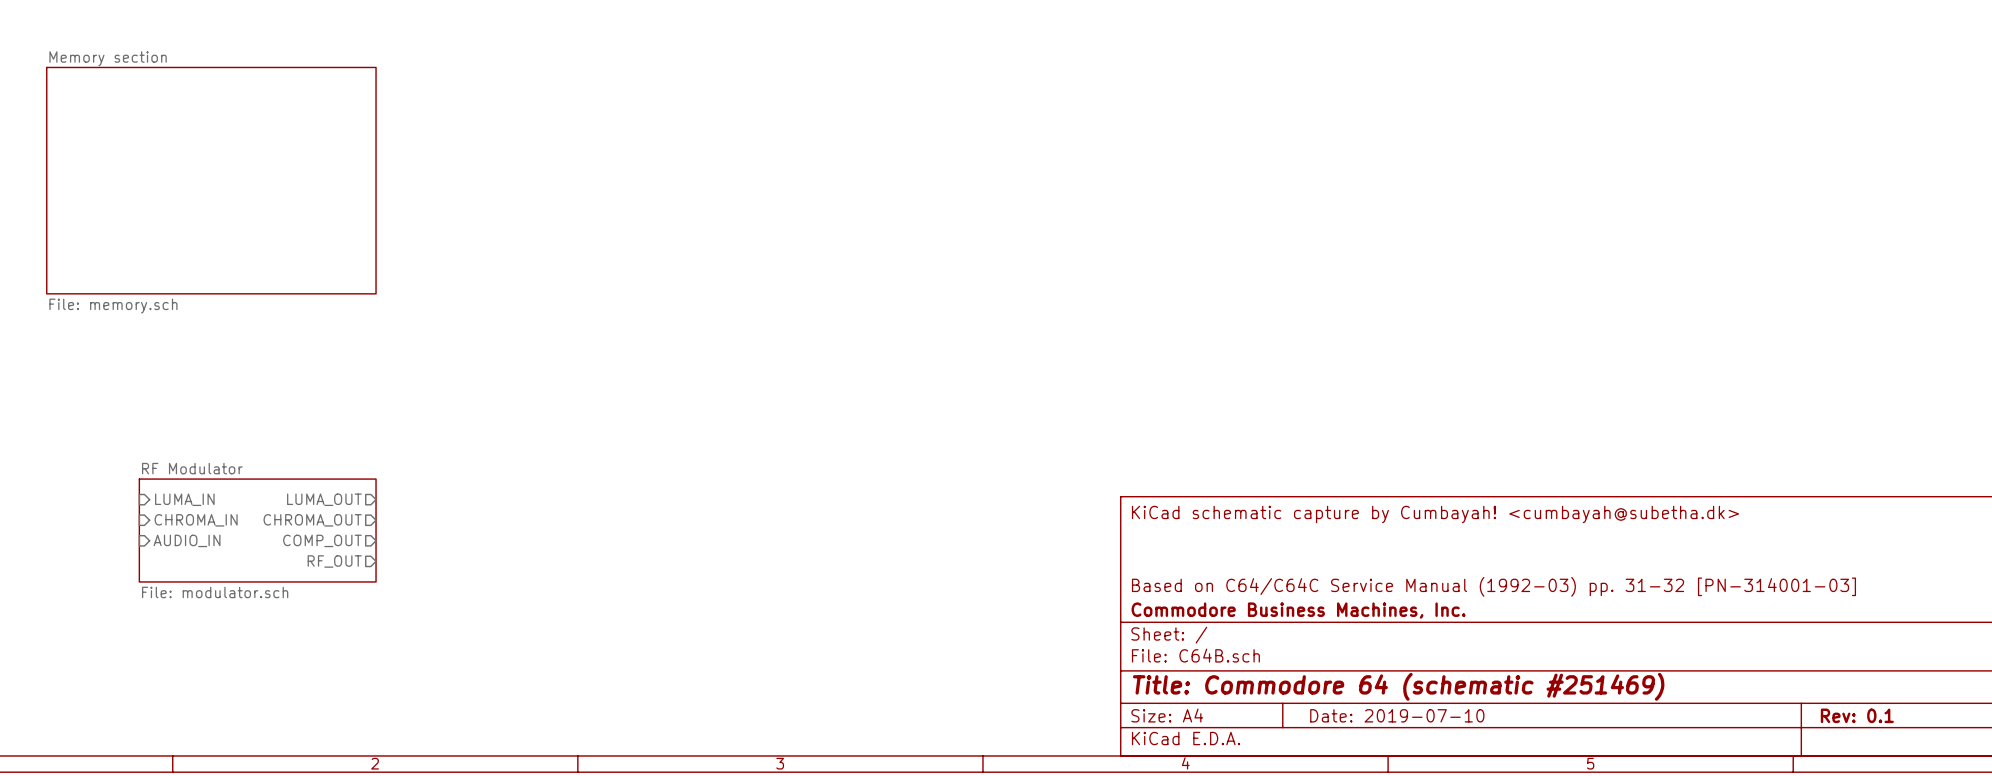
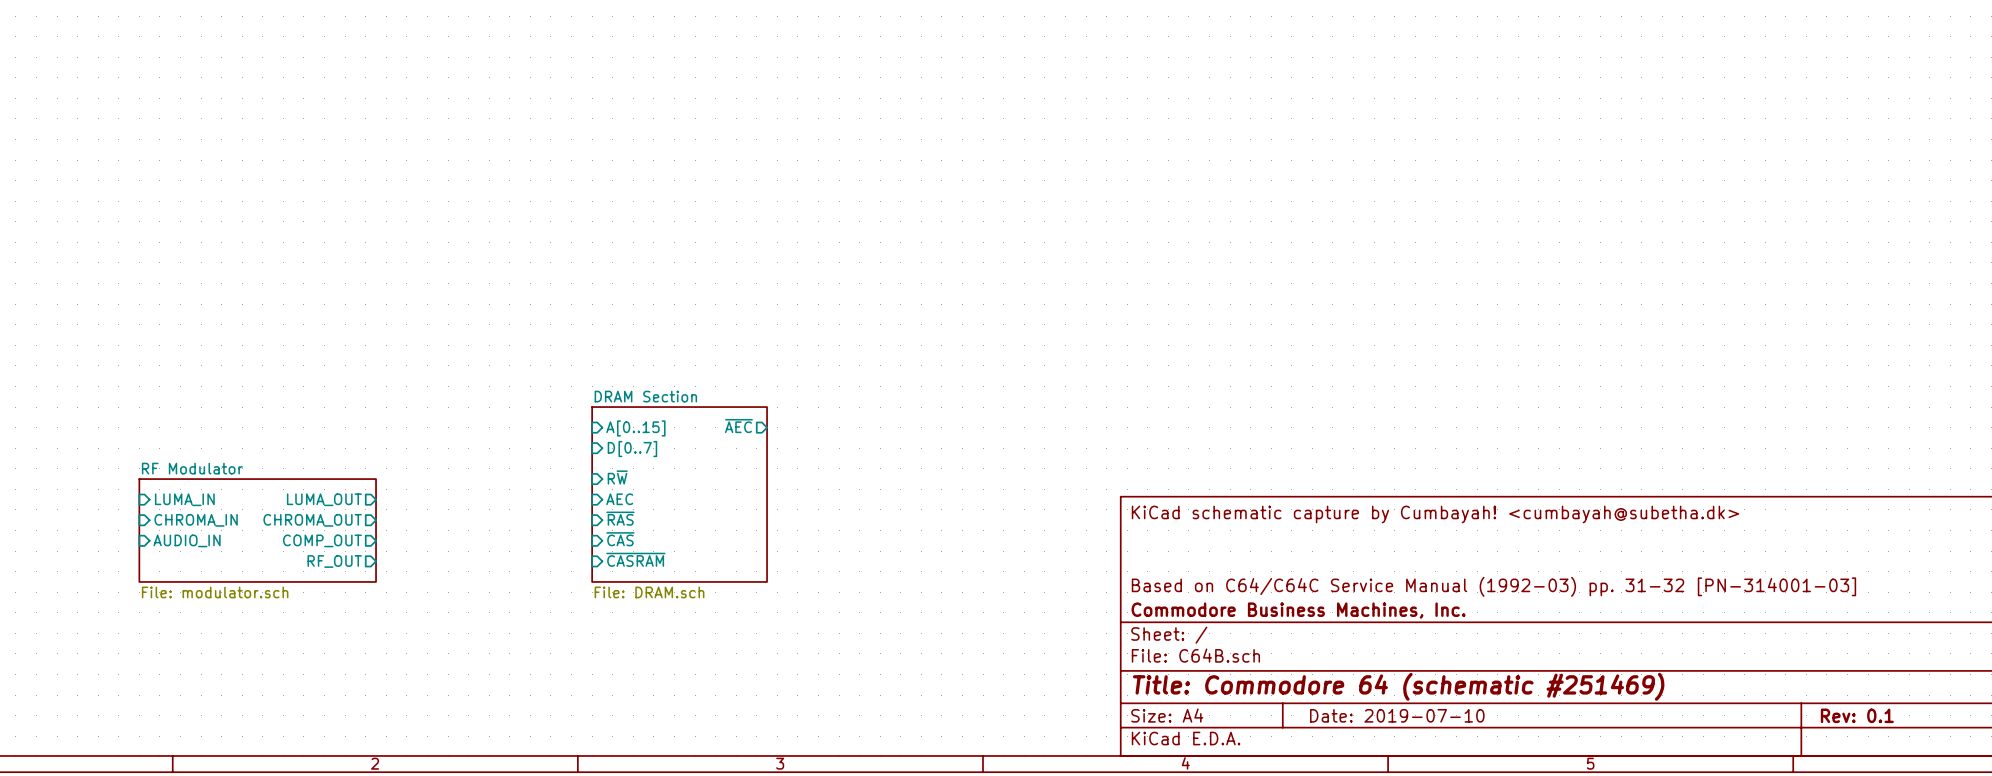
sheet Memory section: File: memory.sch (211, 180) -> none
sheet pin: none -> ~{AEC} (738, 426)
sheet pin: none -> A[0..15] (635, 428)
sheet pin: none -> D[0..7] (632, 449)
sheet pin: none -> R~{W} (617, 477)
sheet DRAM Section: none -> File: DRAM.sch (679, 494)
sheet pin: none -> AEC (619, 499)
sheet pin: none -> ~{RAS} (620, 518)
sheet pin: none -> ~{CAS} (620, 539)
sheet pin: none -> ~{CASRAM} (635, 559)

